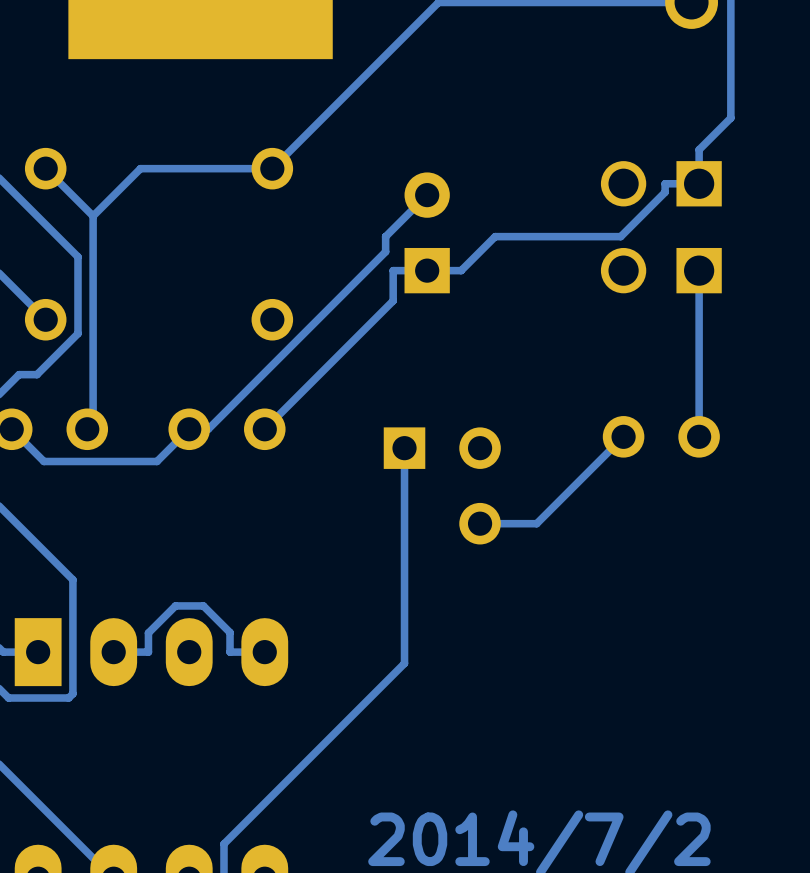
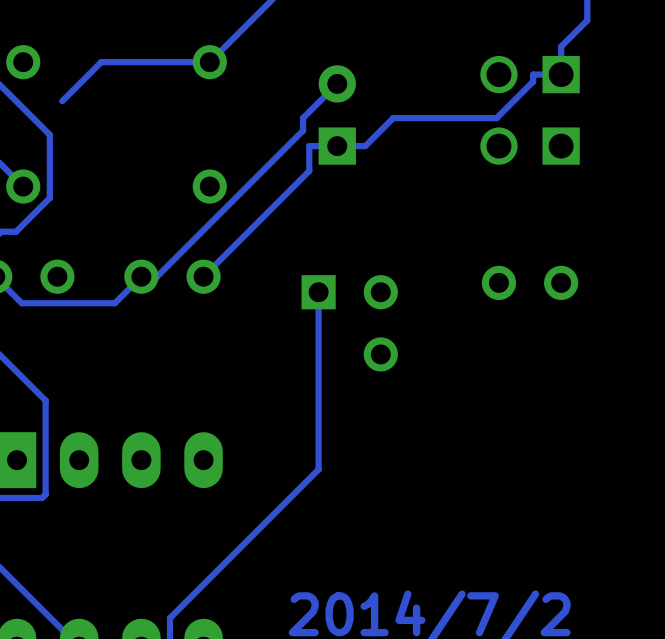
track: (45, 168) (93, 216) (93, 423) (87, 429) -> none
track: (699, 270) (699, 436) -> none
track: (623, 436) (536, 523) (480, 523) -> none
track: (264, 652) (230, 652) (230, 632) (203, 605) (175, 605) (148, 632) (148, 652) (113, 652) -> none

